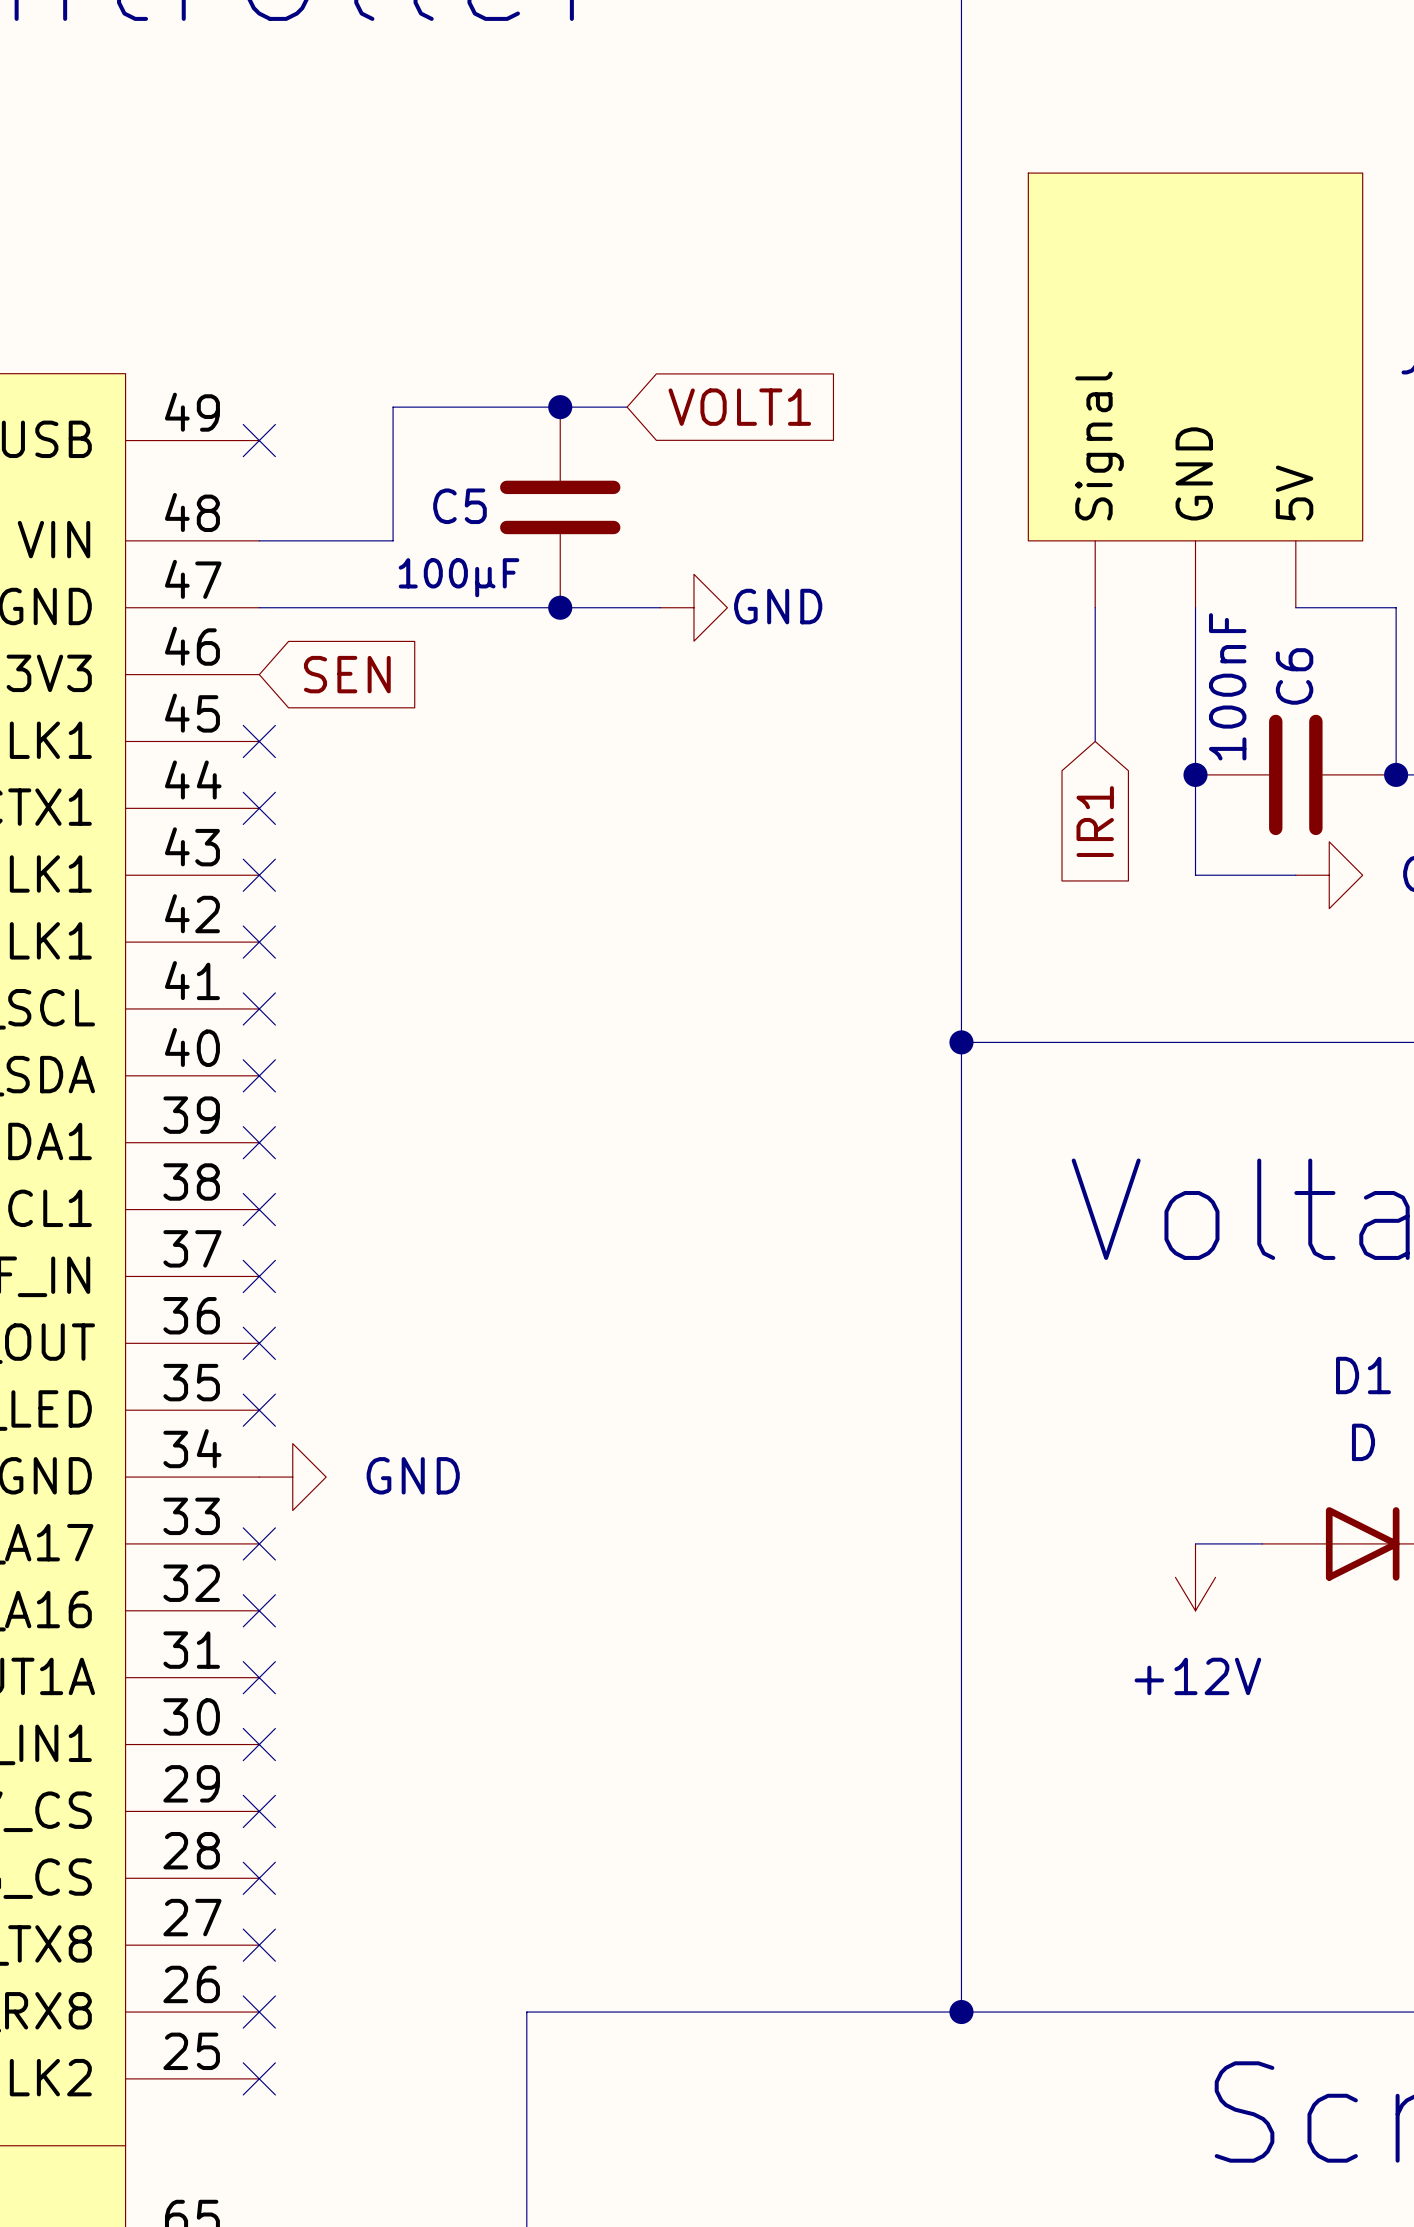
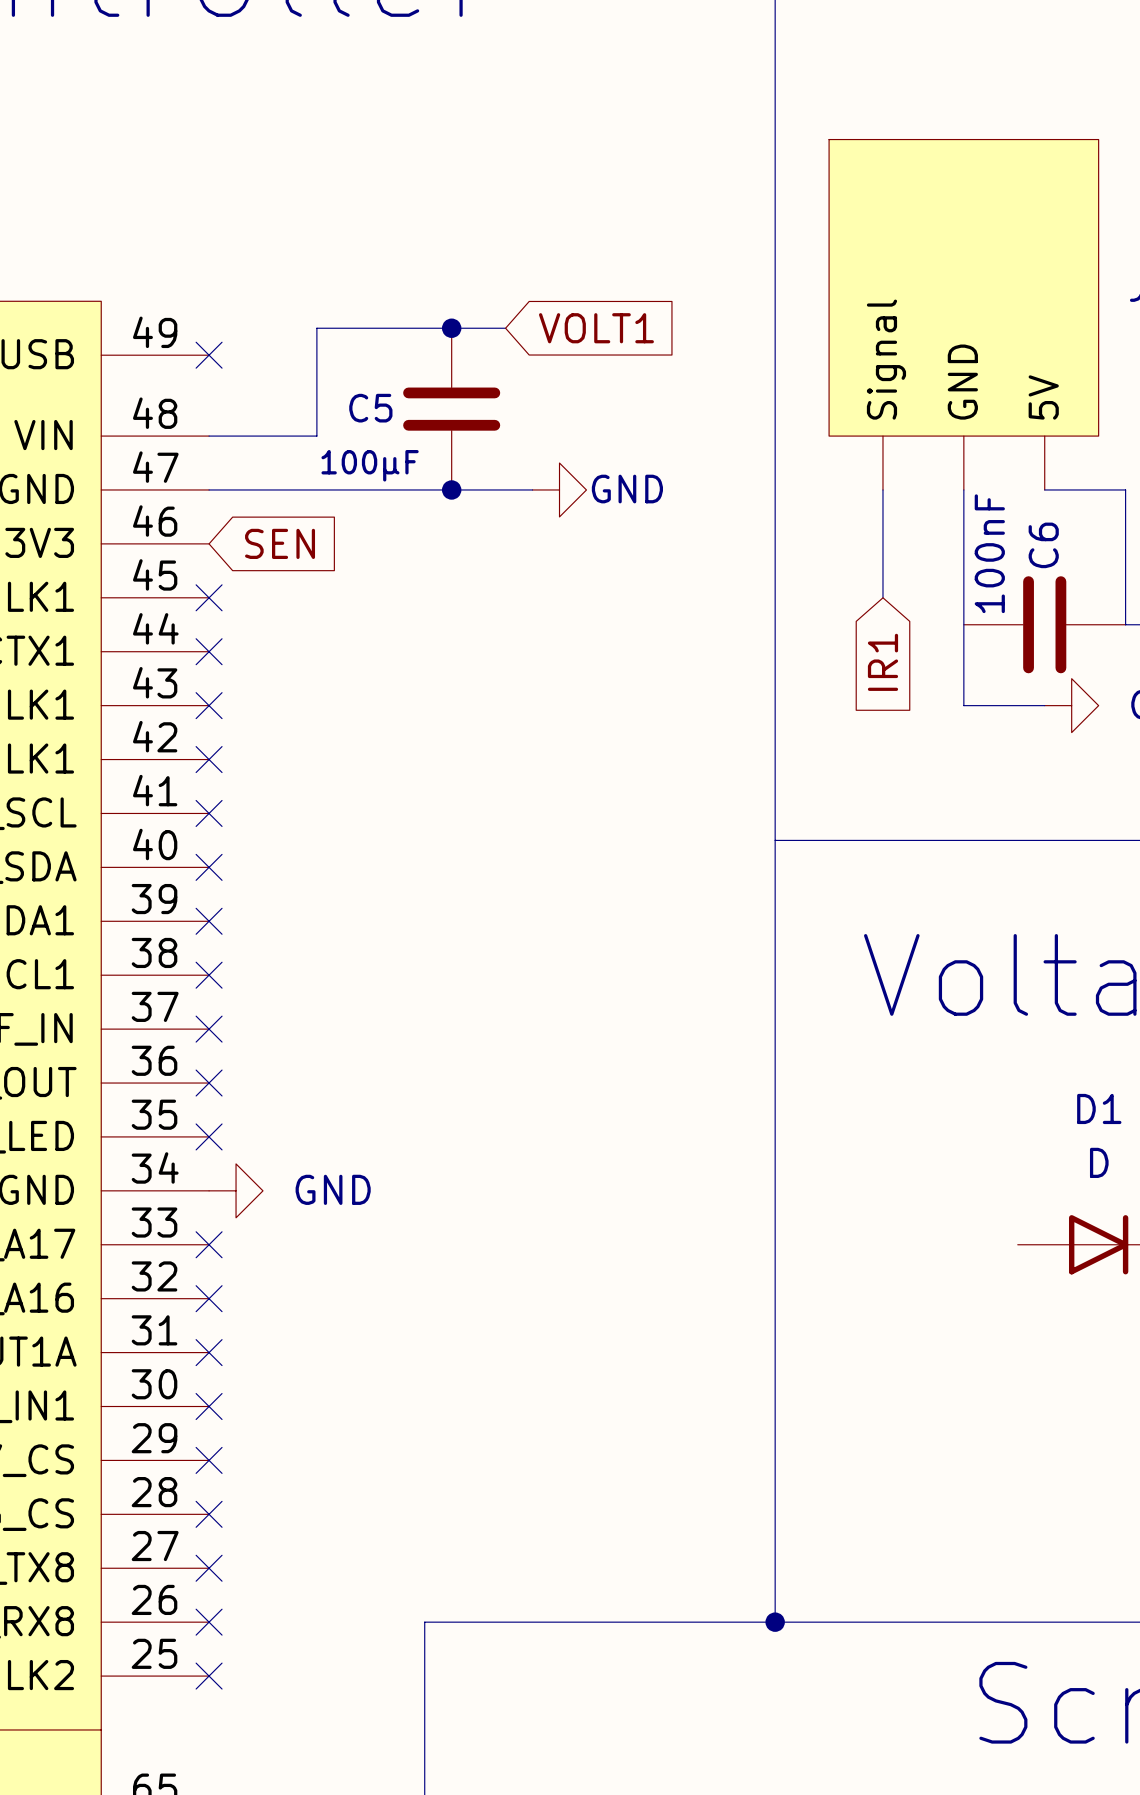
junction: (1195, 774) -> none
junction: (1396, 774) -> none
junction: (961, 1042) -> none
wire: (1195, 1543) (1262, 1543) -> none
power symbol: +12V (1195, 1577) -> none

